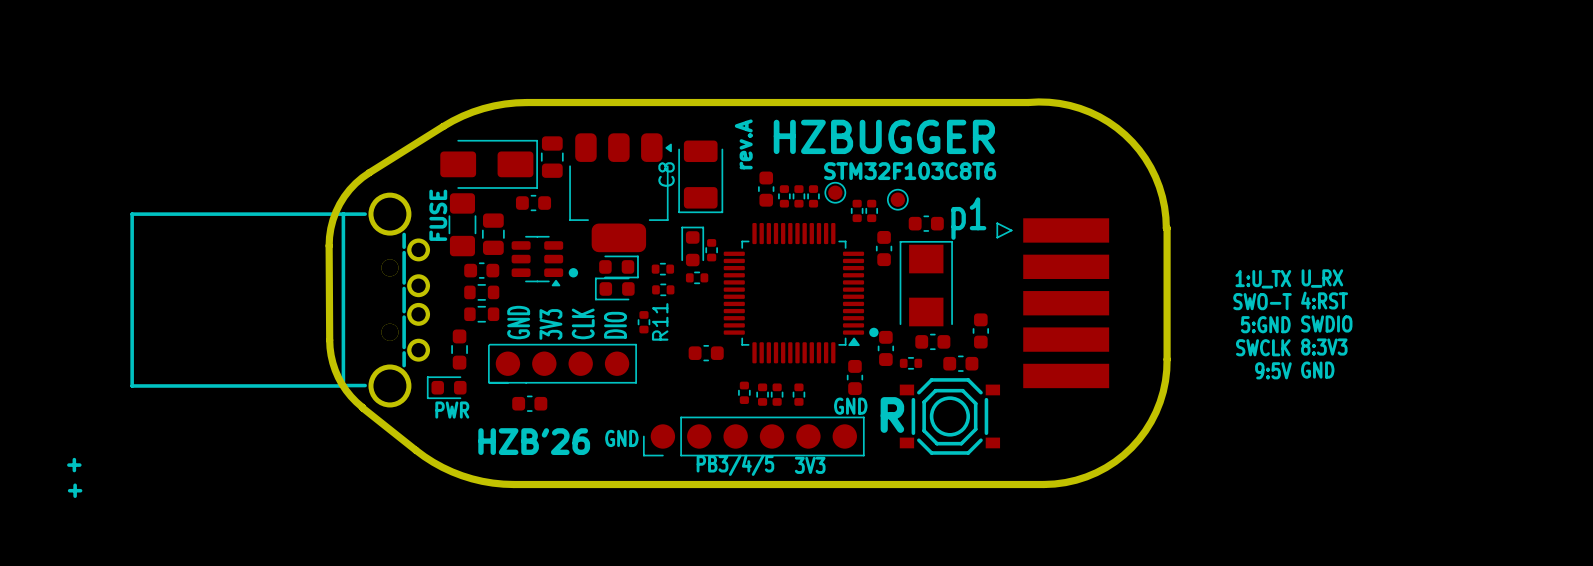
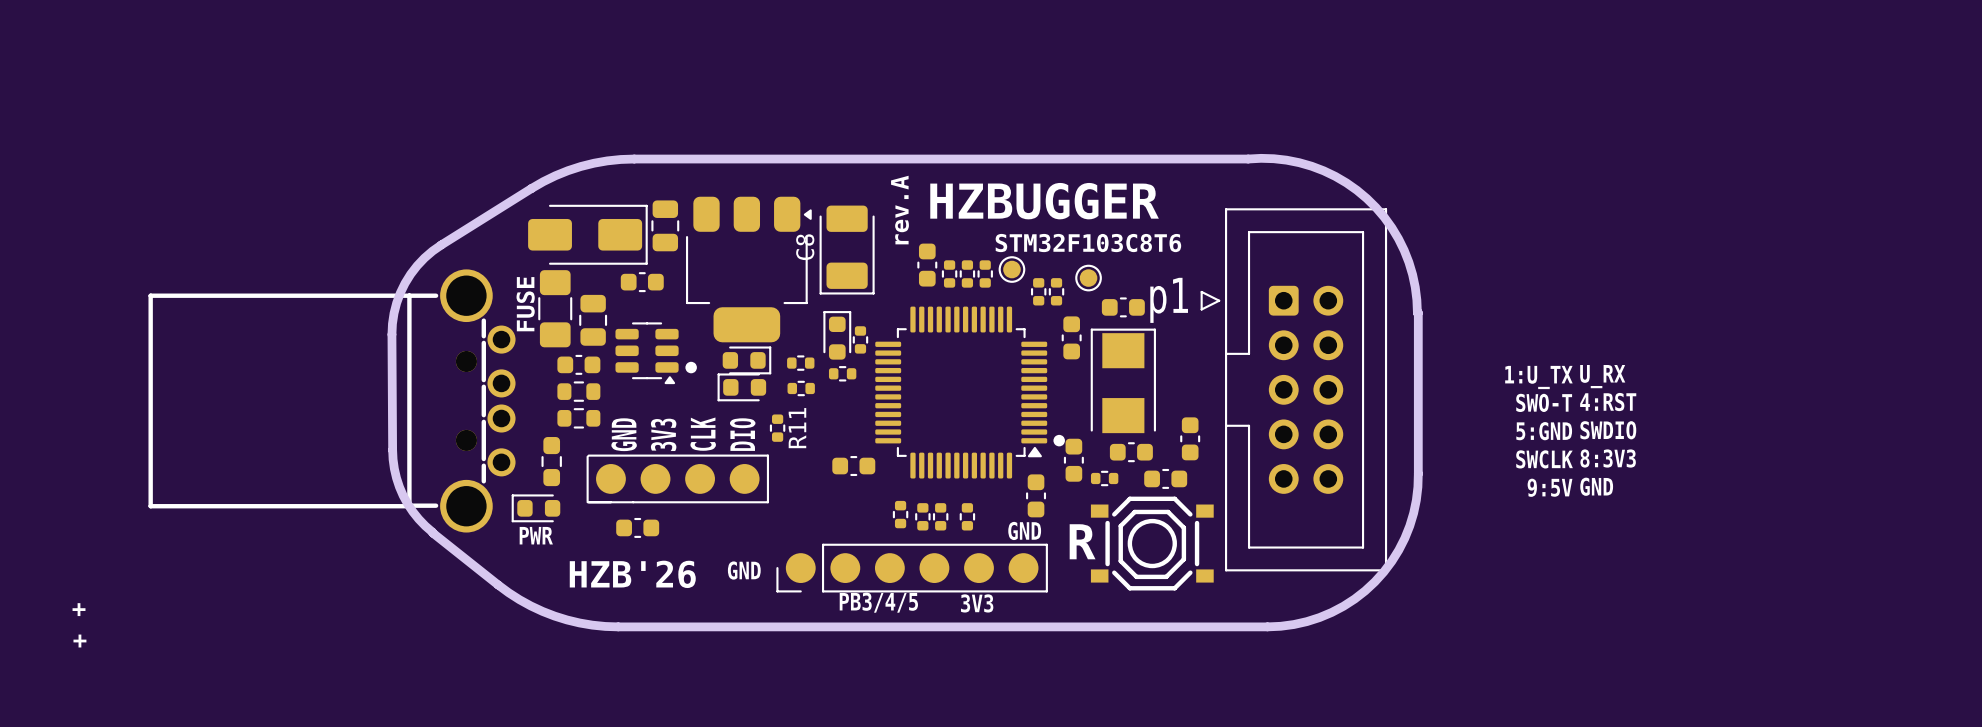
part: none -> (1293, 389)
part: (1052, 303) -> none

